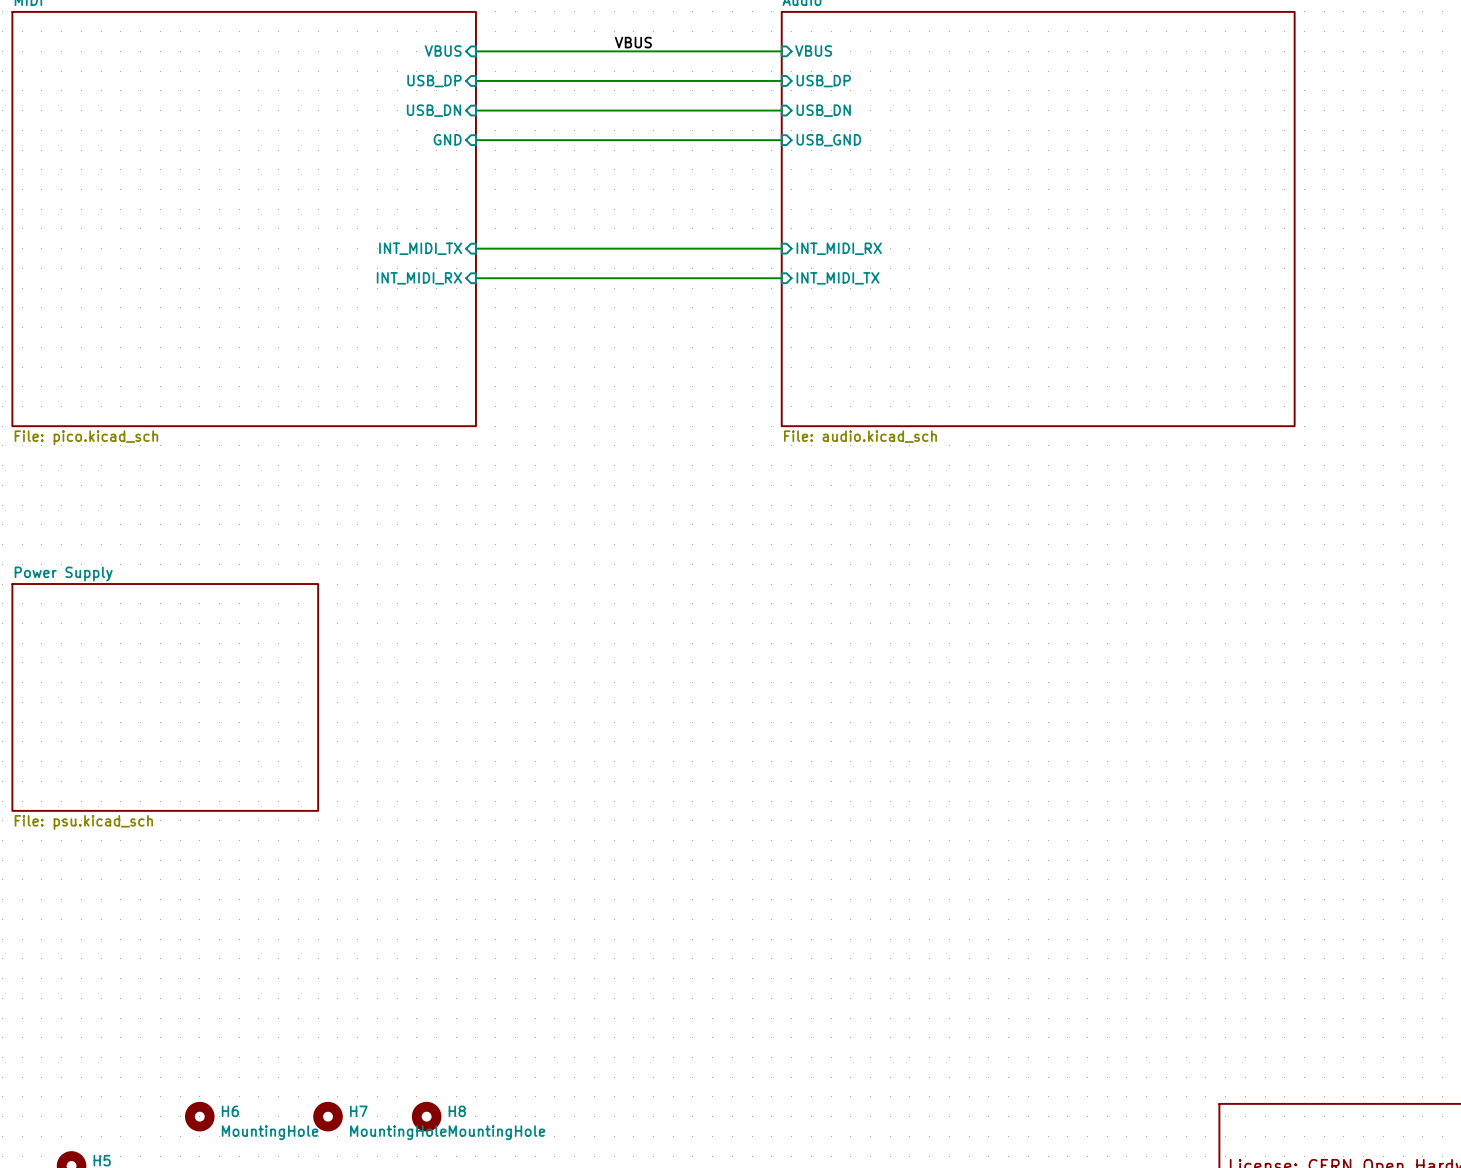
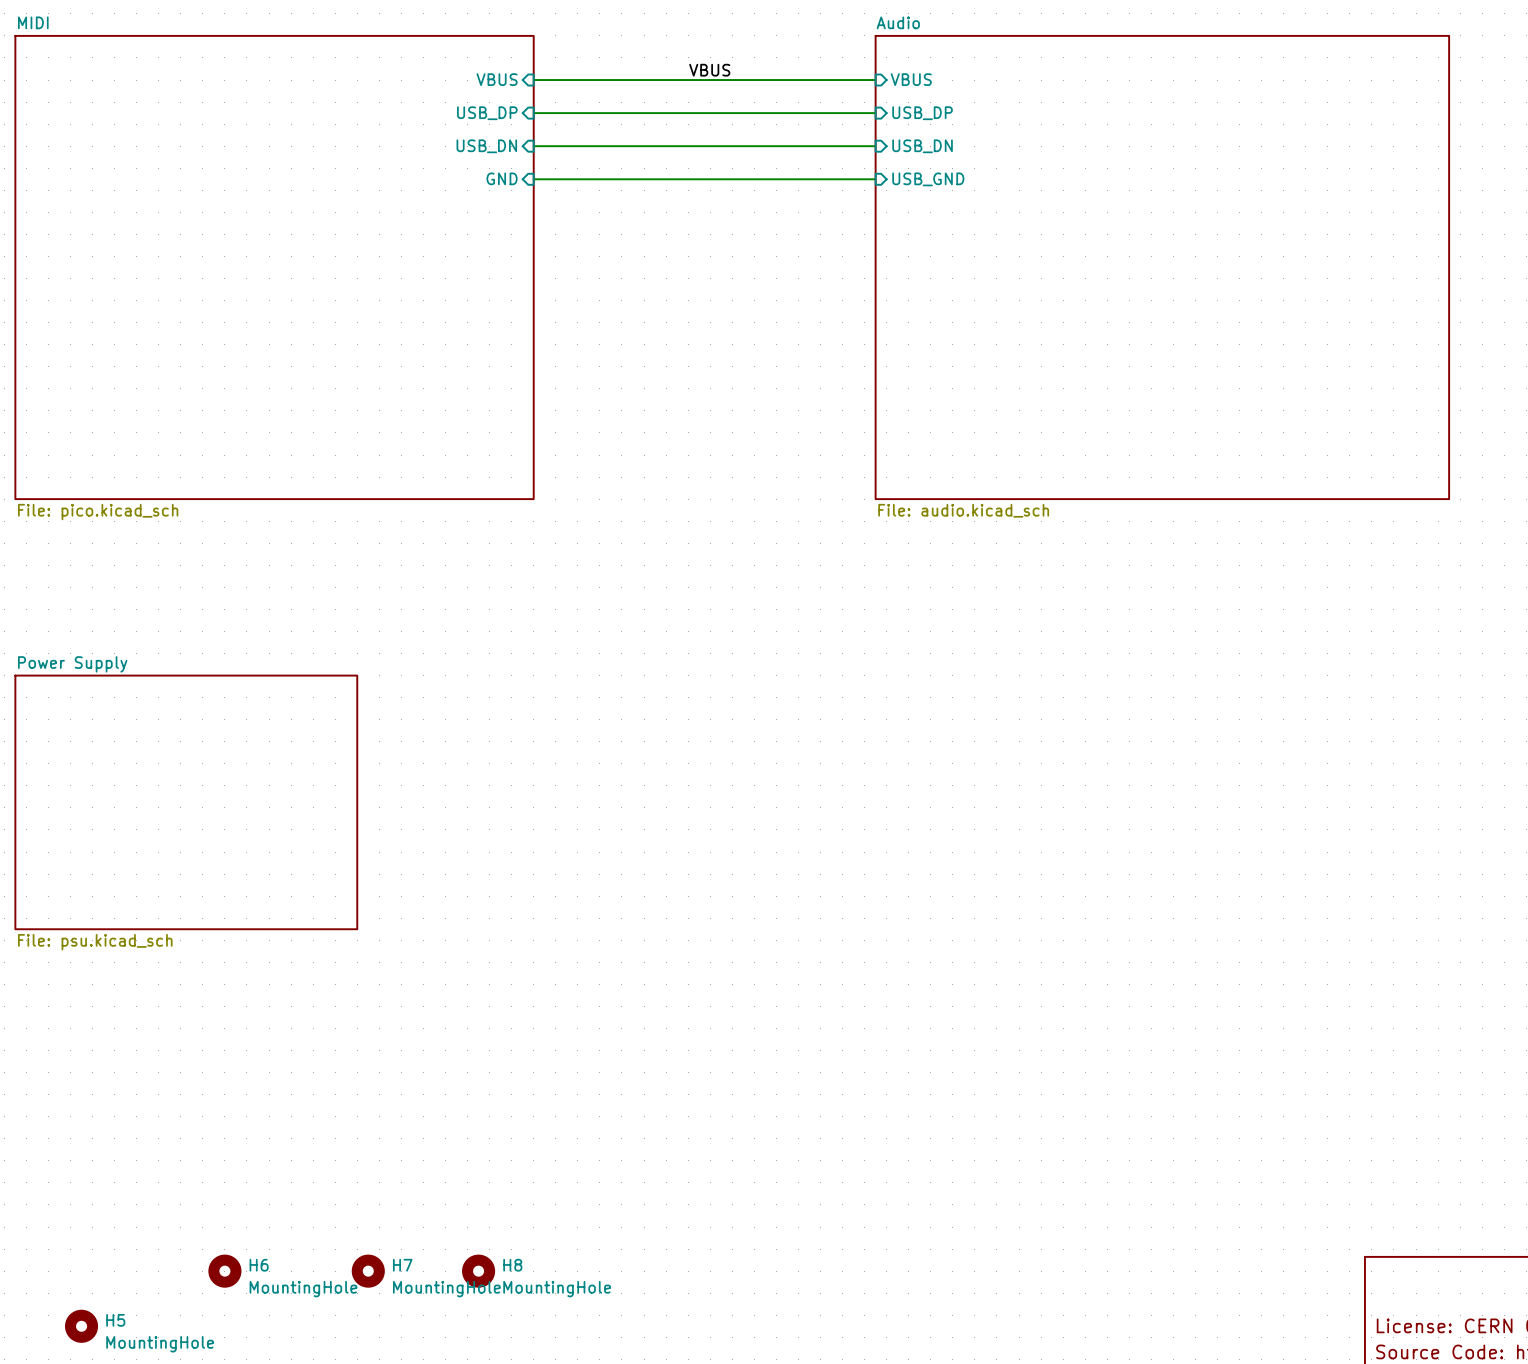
sheet pin: INT_MIDI_TX (420, 248) -> none
wire: (475, 248) (781, 248) -> none
sheet pin: INT_MIDI_RX (839, 248) -> none
sheet pin: INT_MIDI_RX (419, 278) -> none
wire: (475, 278) (781, 278) -> none
sheet pin: INT_MIDI_TX (838, 278) -> none

